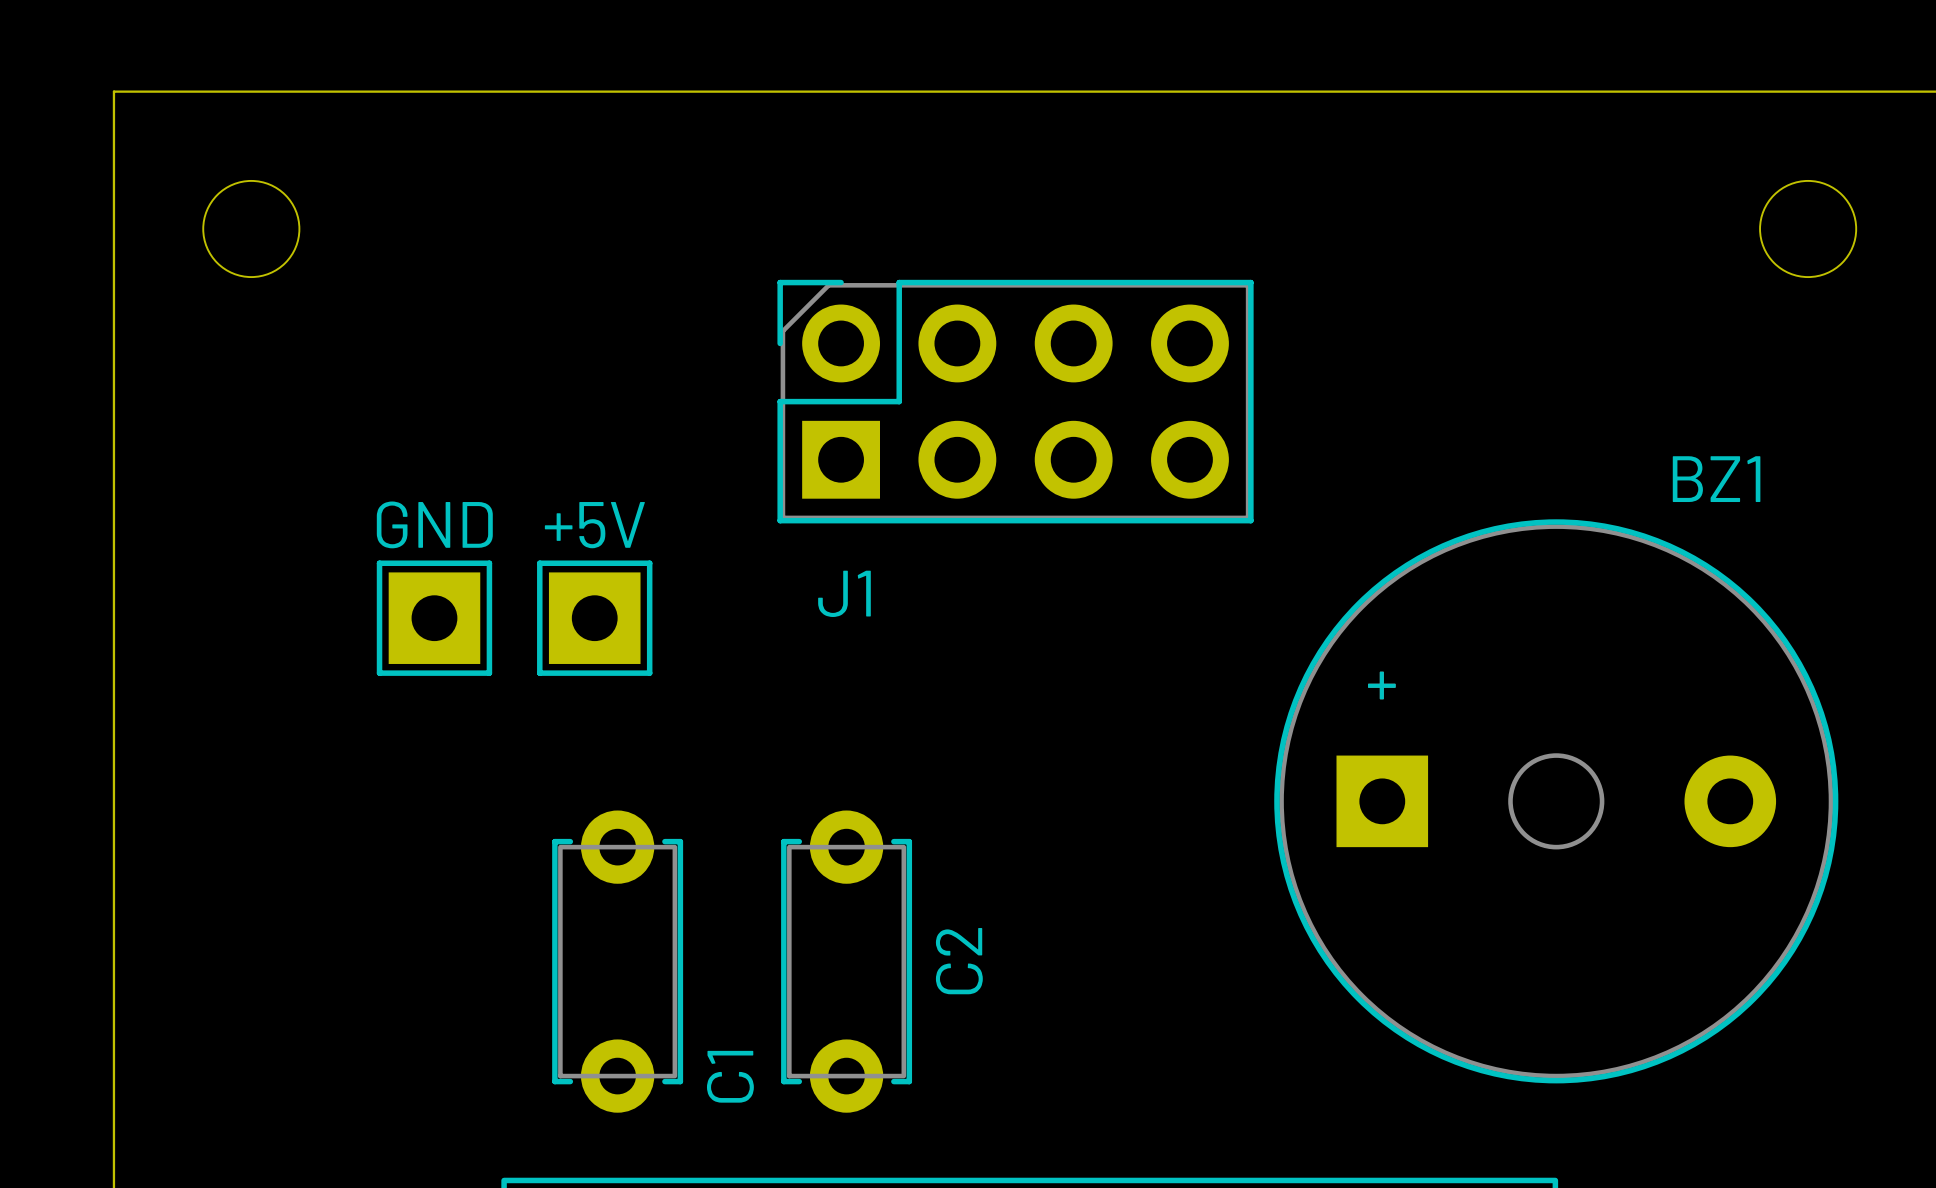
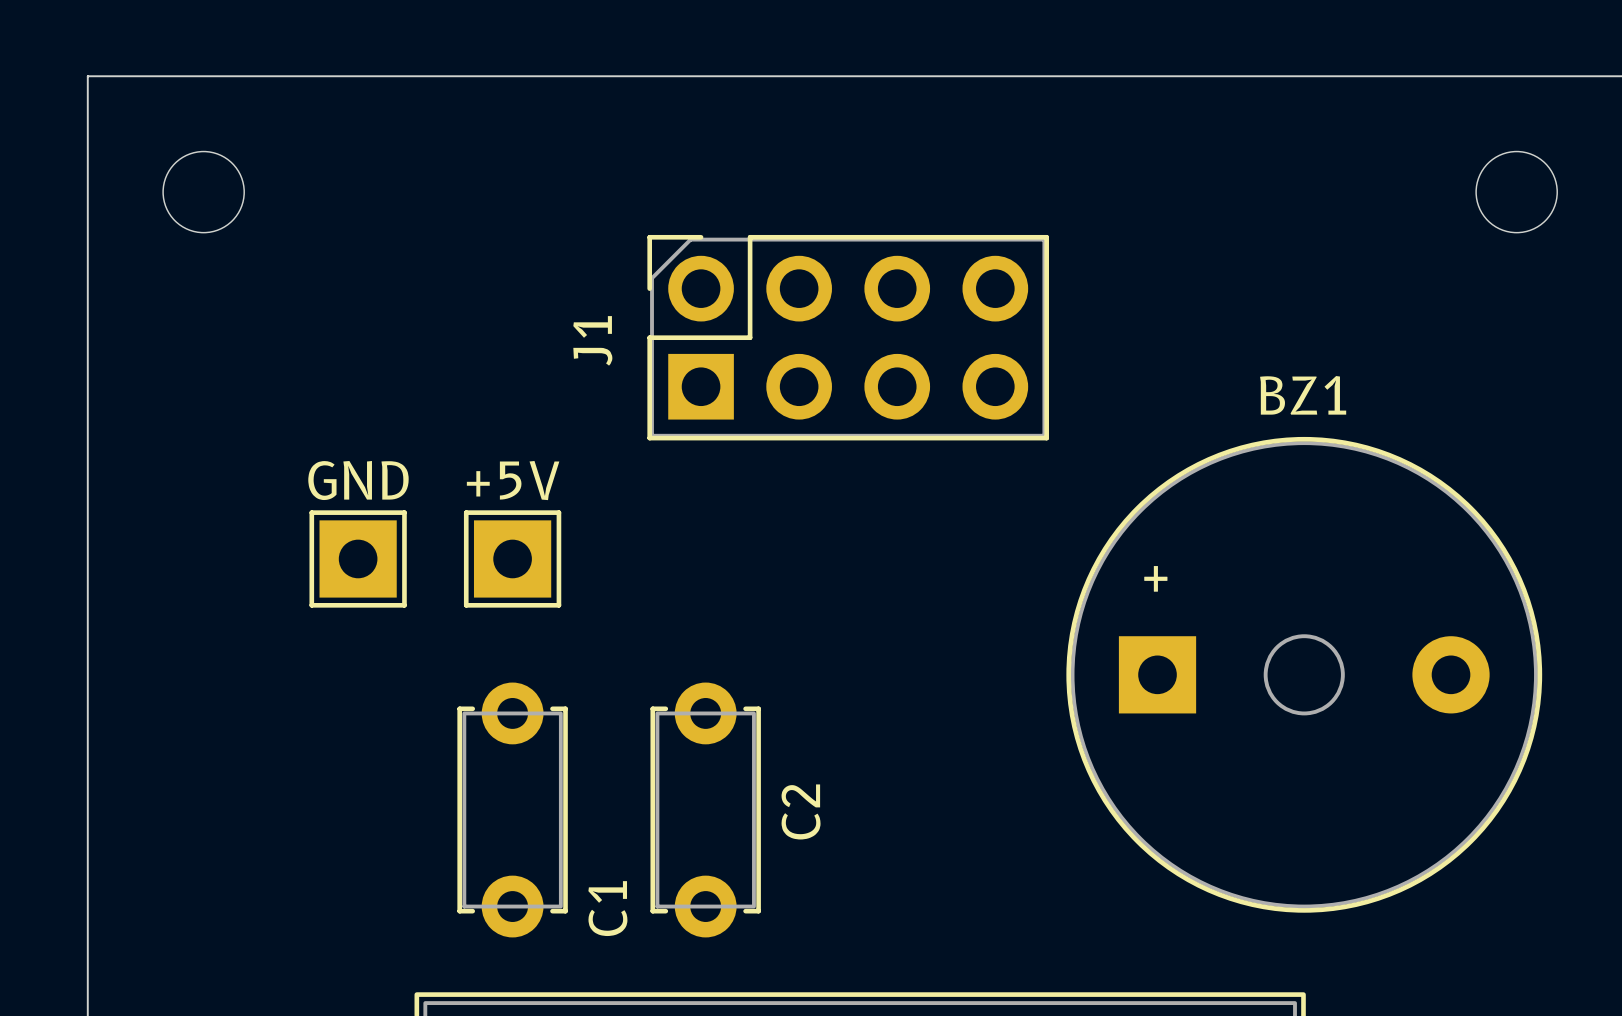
BZ1 name position: BZ1 (1716, 479) -> BZ1 (1303, 395)
J1 name rotation: 0° (844, 593) -> 90° counterclockwise (592, 340)
J1 name position: J1 (844, 593) -> J1 (592, 340)
part position: (434, 618) -> (358, 558)
part position: (594, 618) -> (512, 558)

